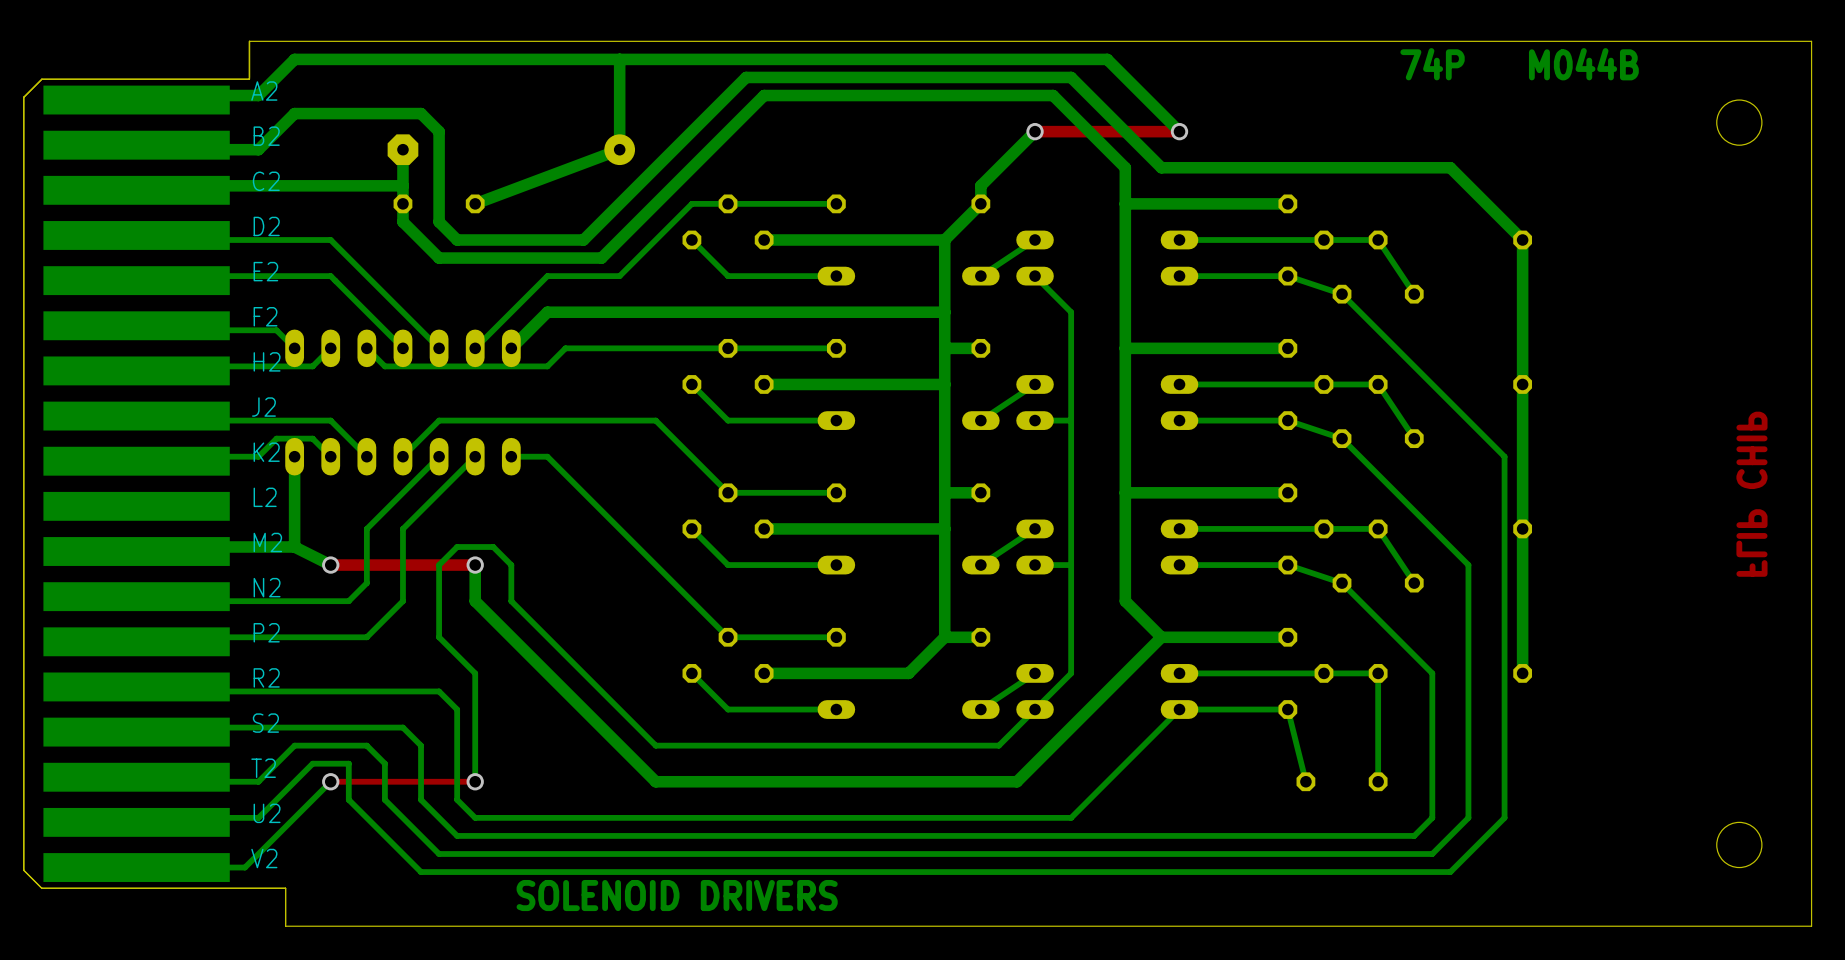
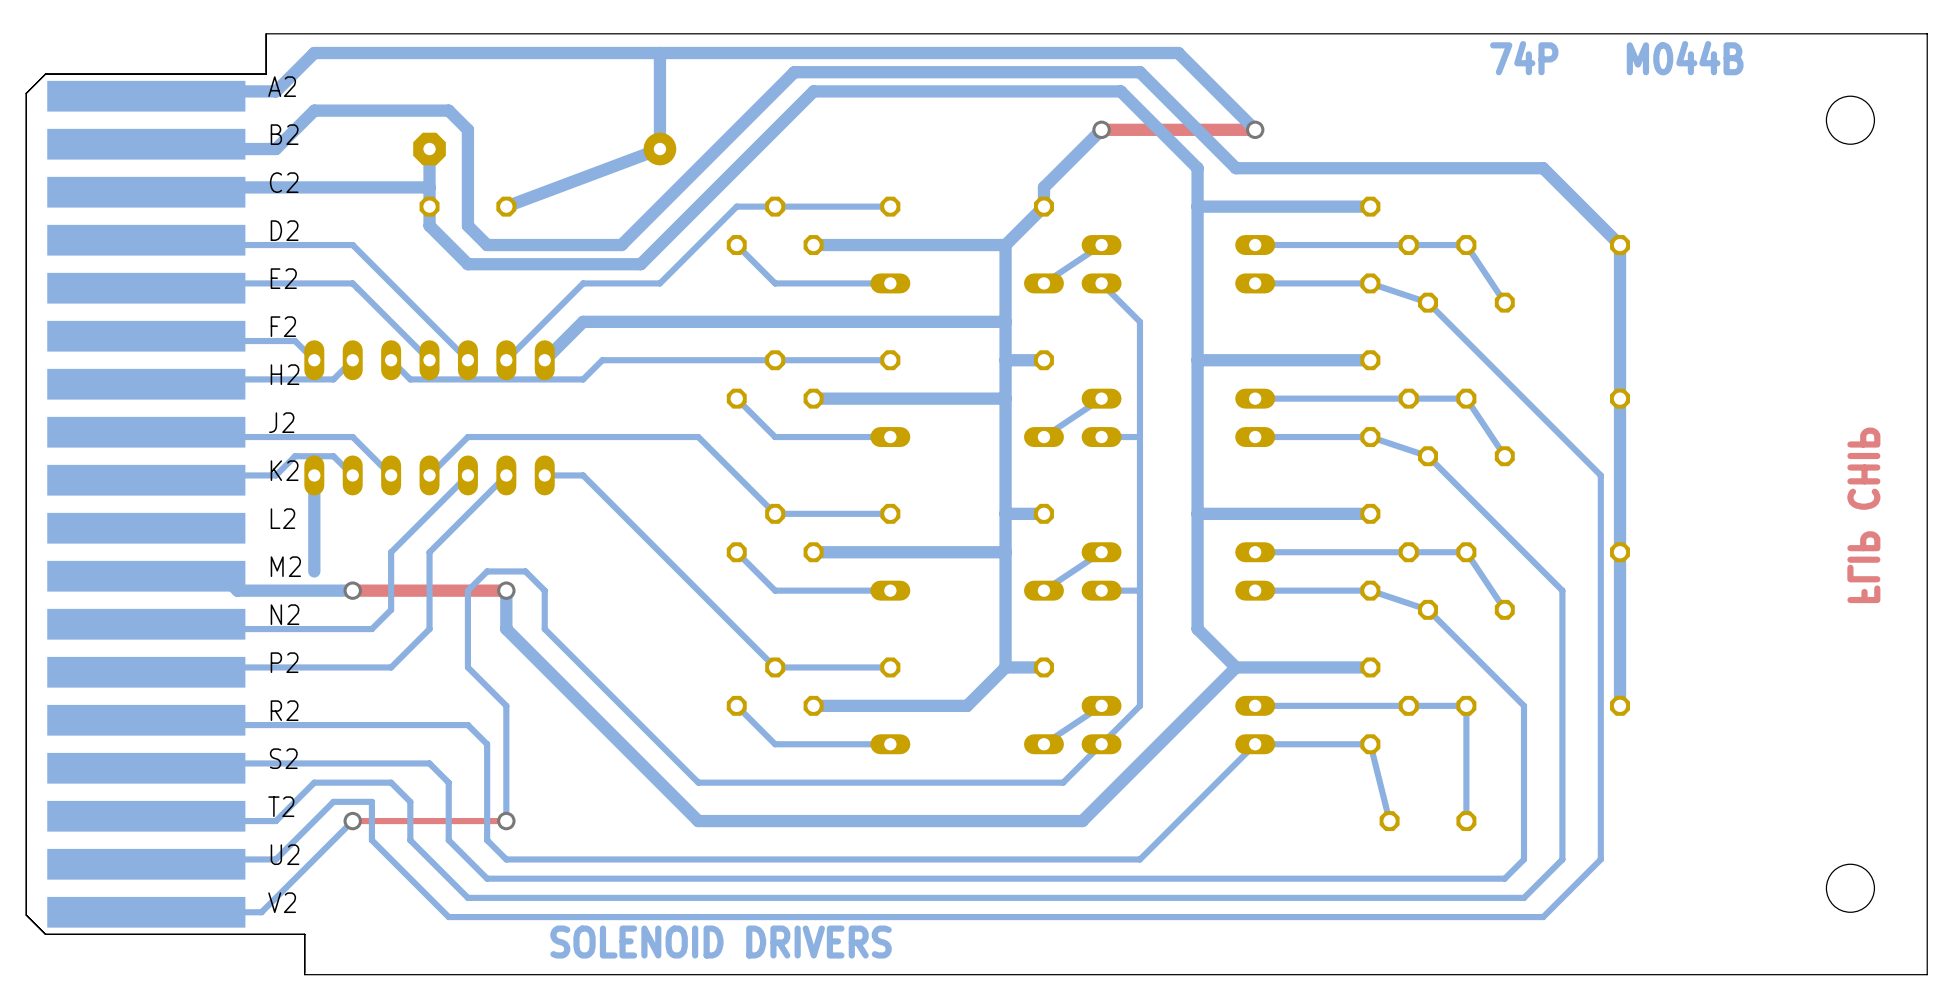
bottom track: (209, 551) (222, 546) (294, 546) (330, 565) -> (223, 576) (237, 590) (352, 590)

